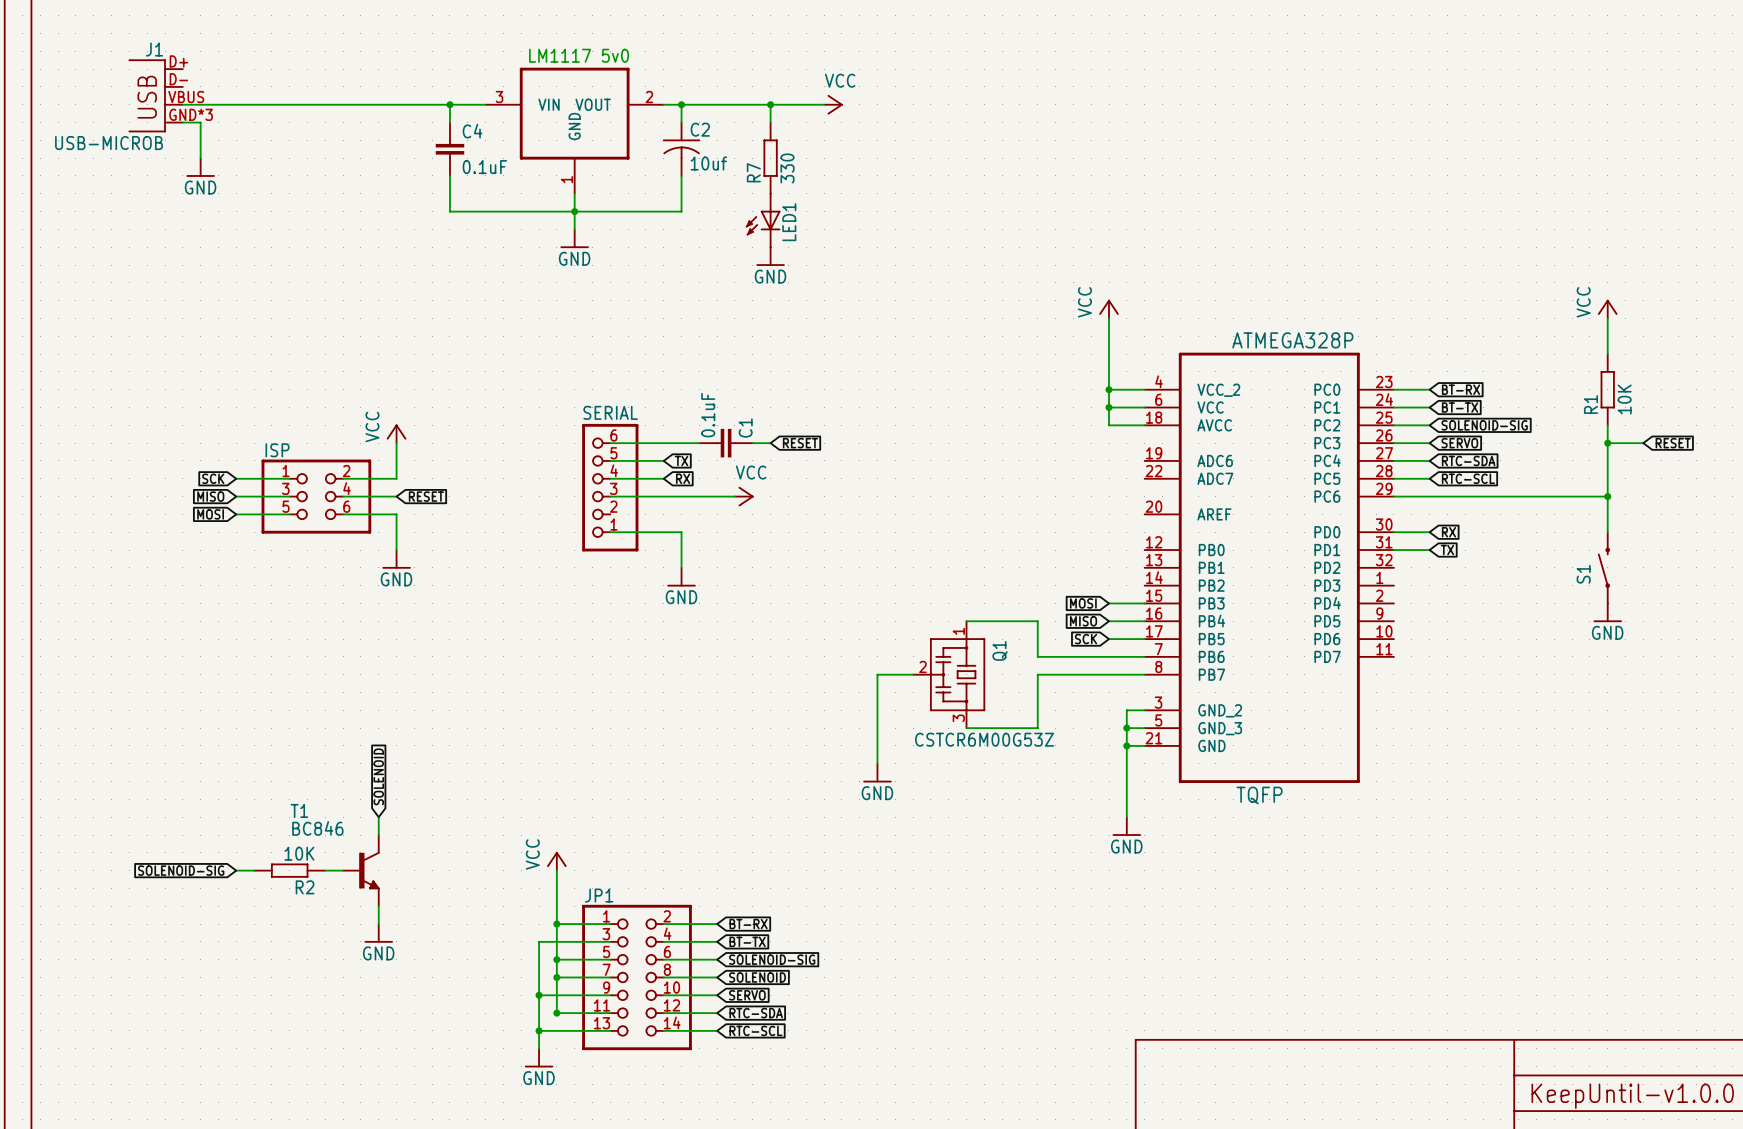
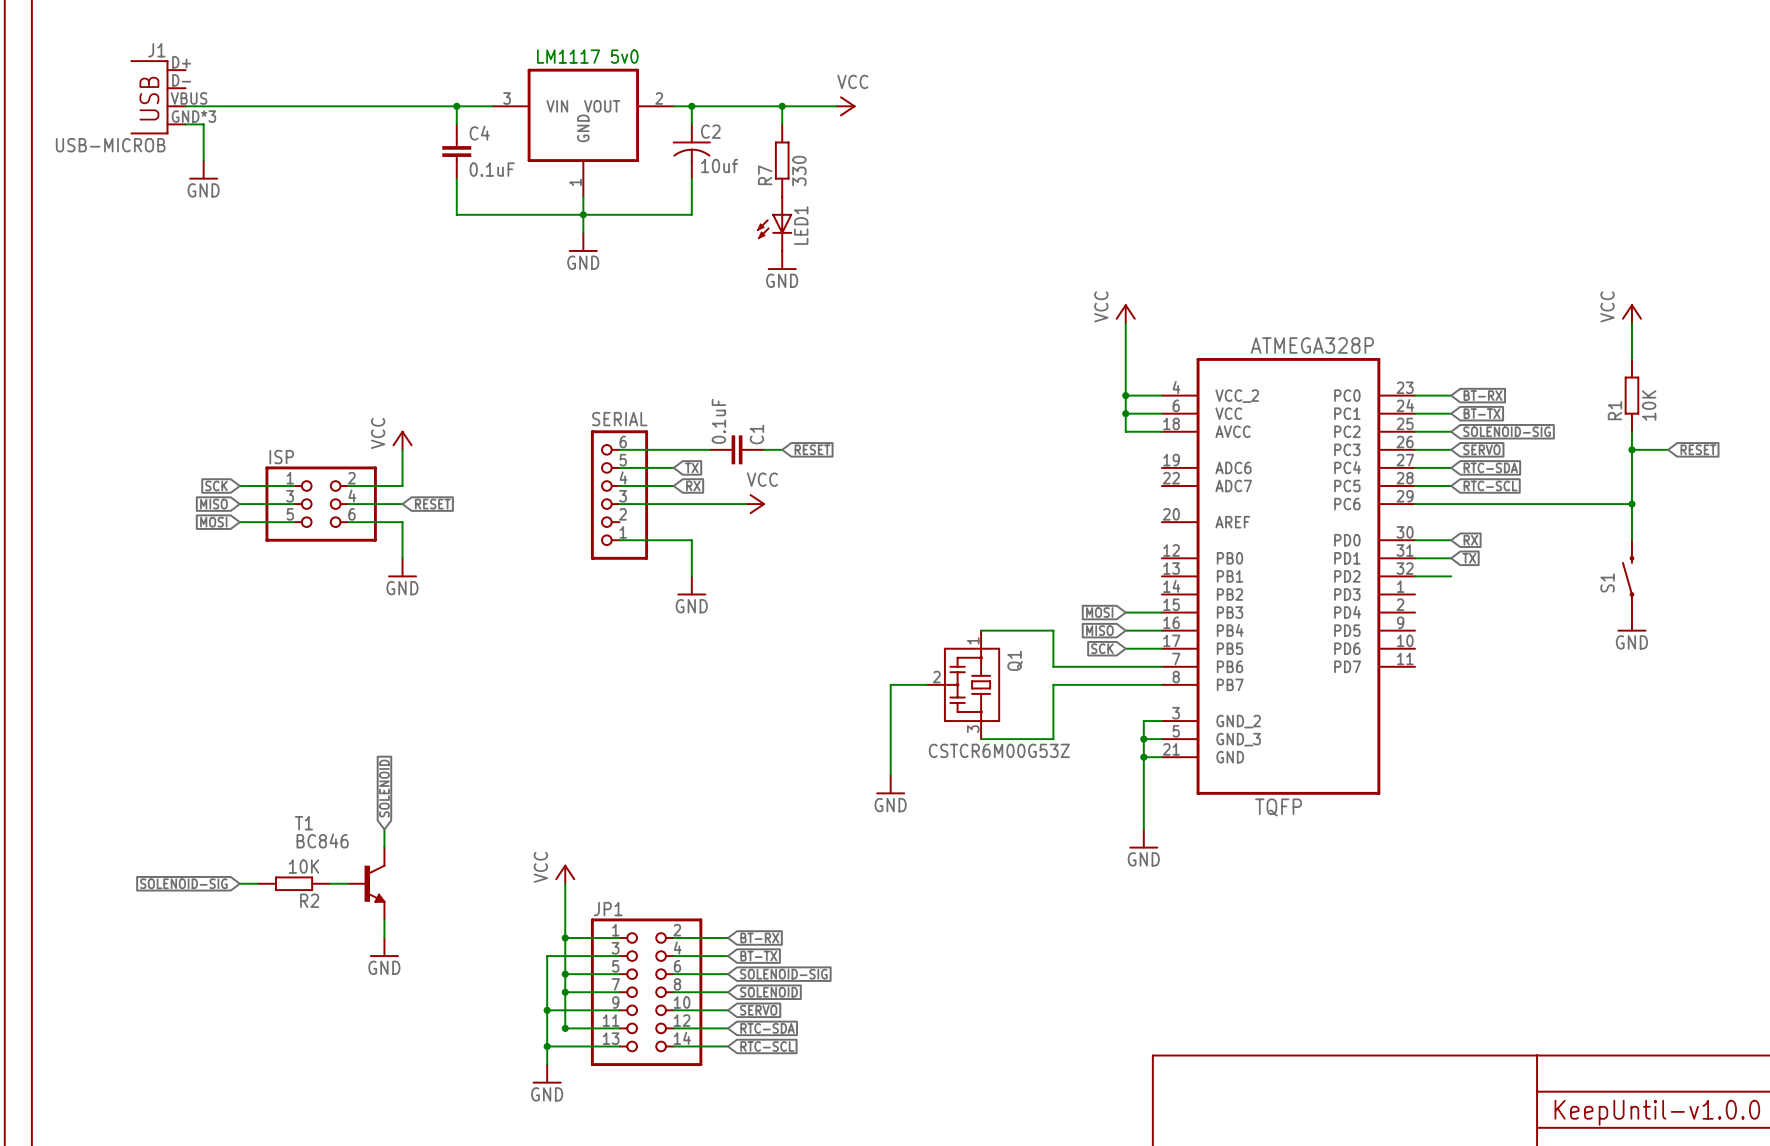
wire: none -> (1415, 576) (1451, 576)

